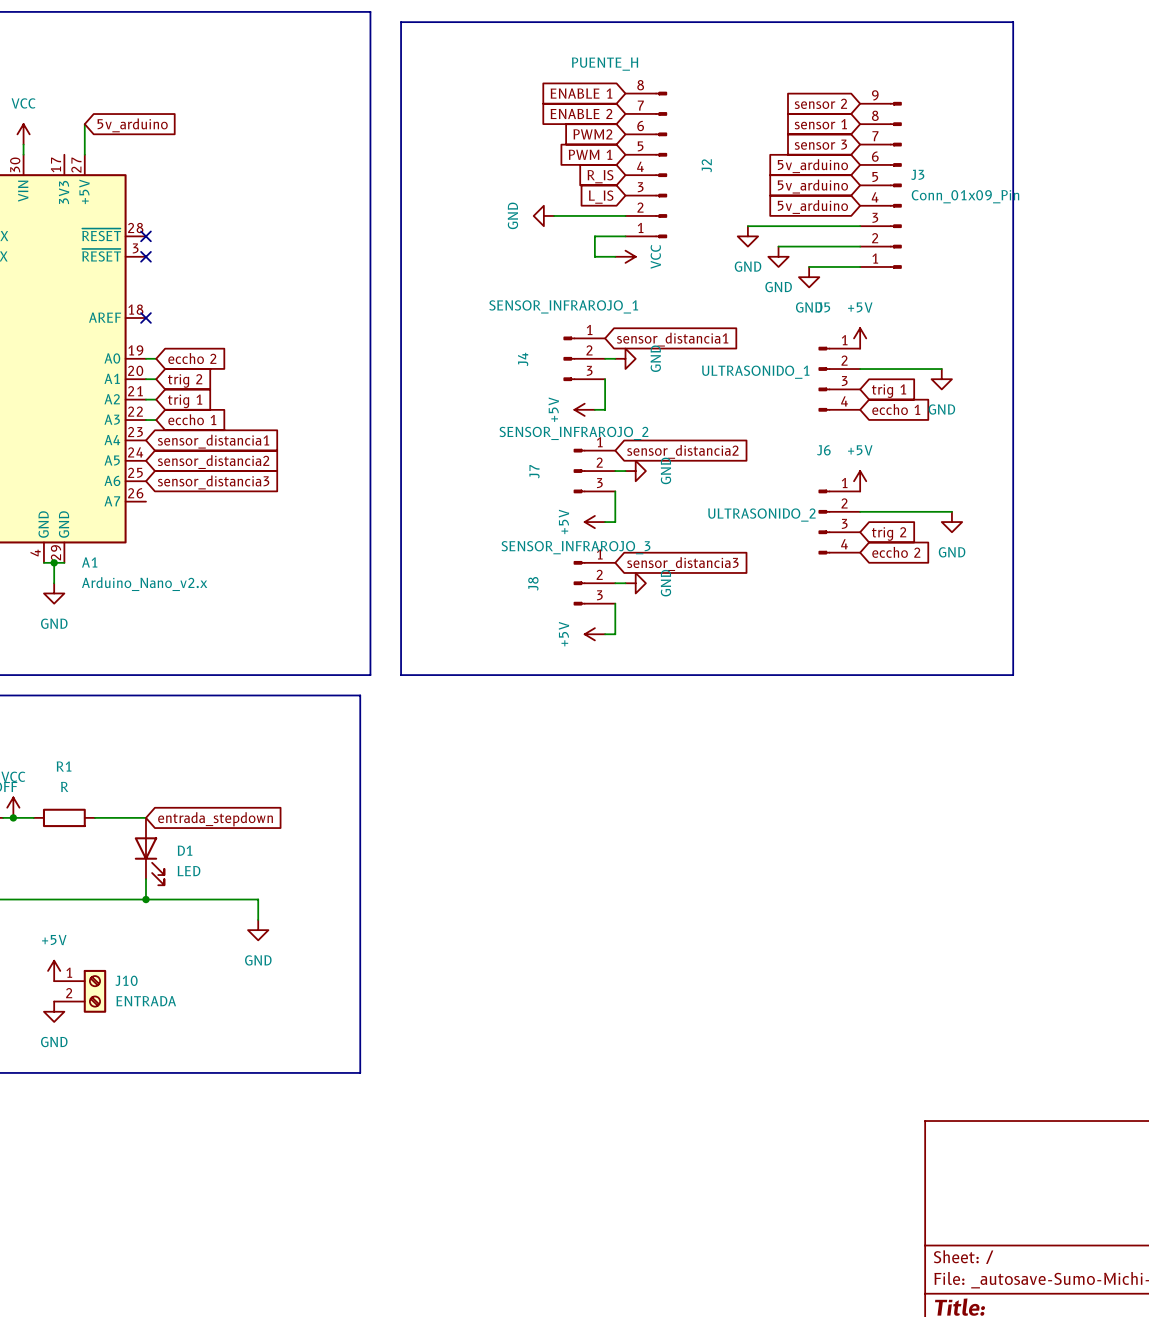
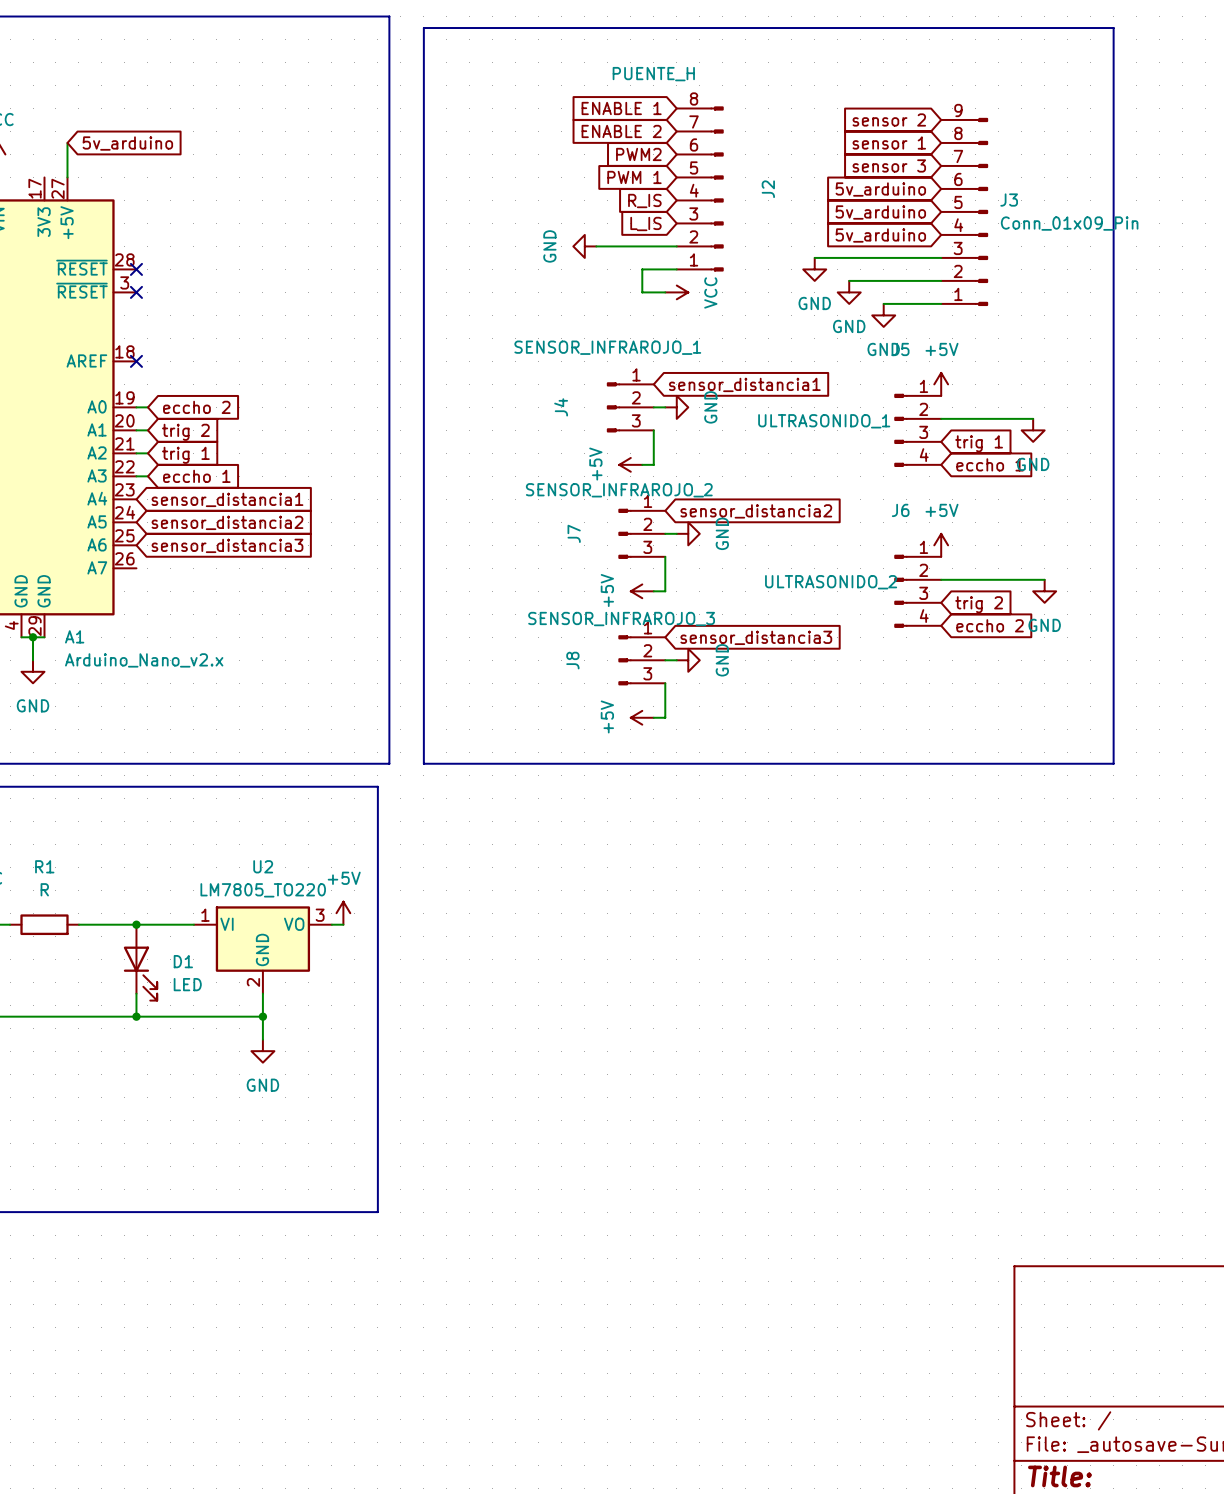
power symbol: none -> +5V (343, 913)
wire: none -> (136, 924) (193, 924)
junction: none -> (136, 924)
wire: none -> (331, 924) (343, 924)
global label: entrada_stepdown (215, 819) -> none
U2: none -> LM7805_TO220 (262, 949)
wire: none -> (262, 993) (262, 1016)
junction: none -> (262, 1016)
power symbol: +5V (54, 970) -> none
J10: ENTRADA (80, 991) -> none
power symbol: GND (54, 1011) -> none

